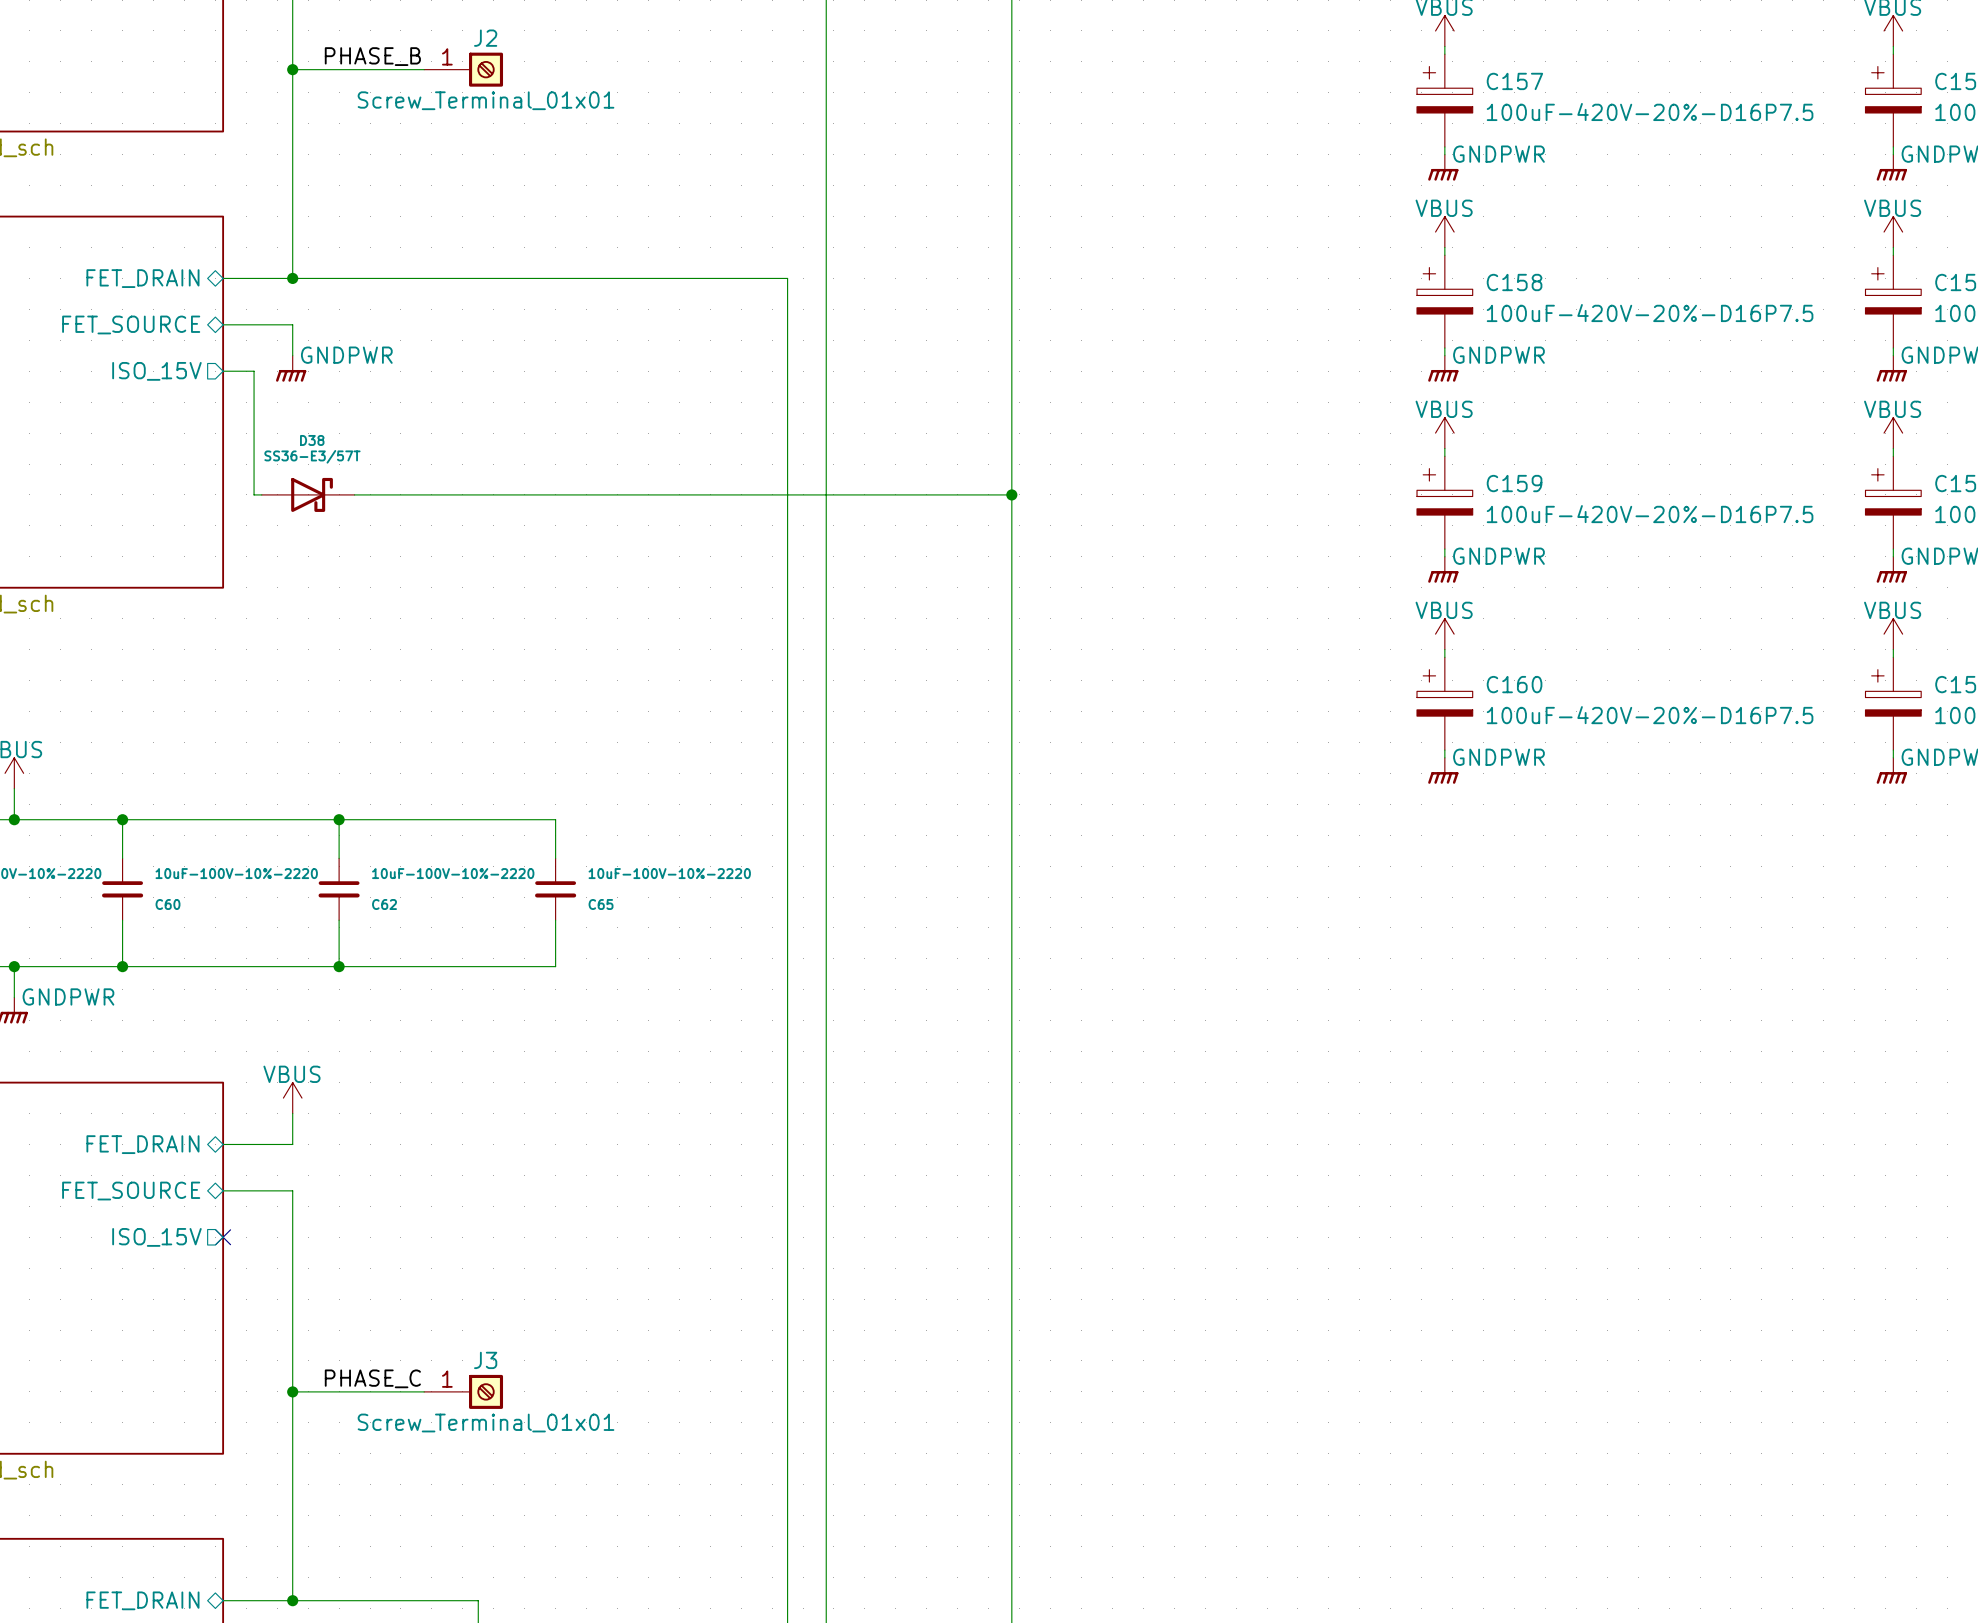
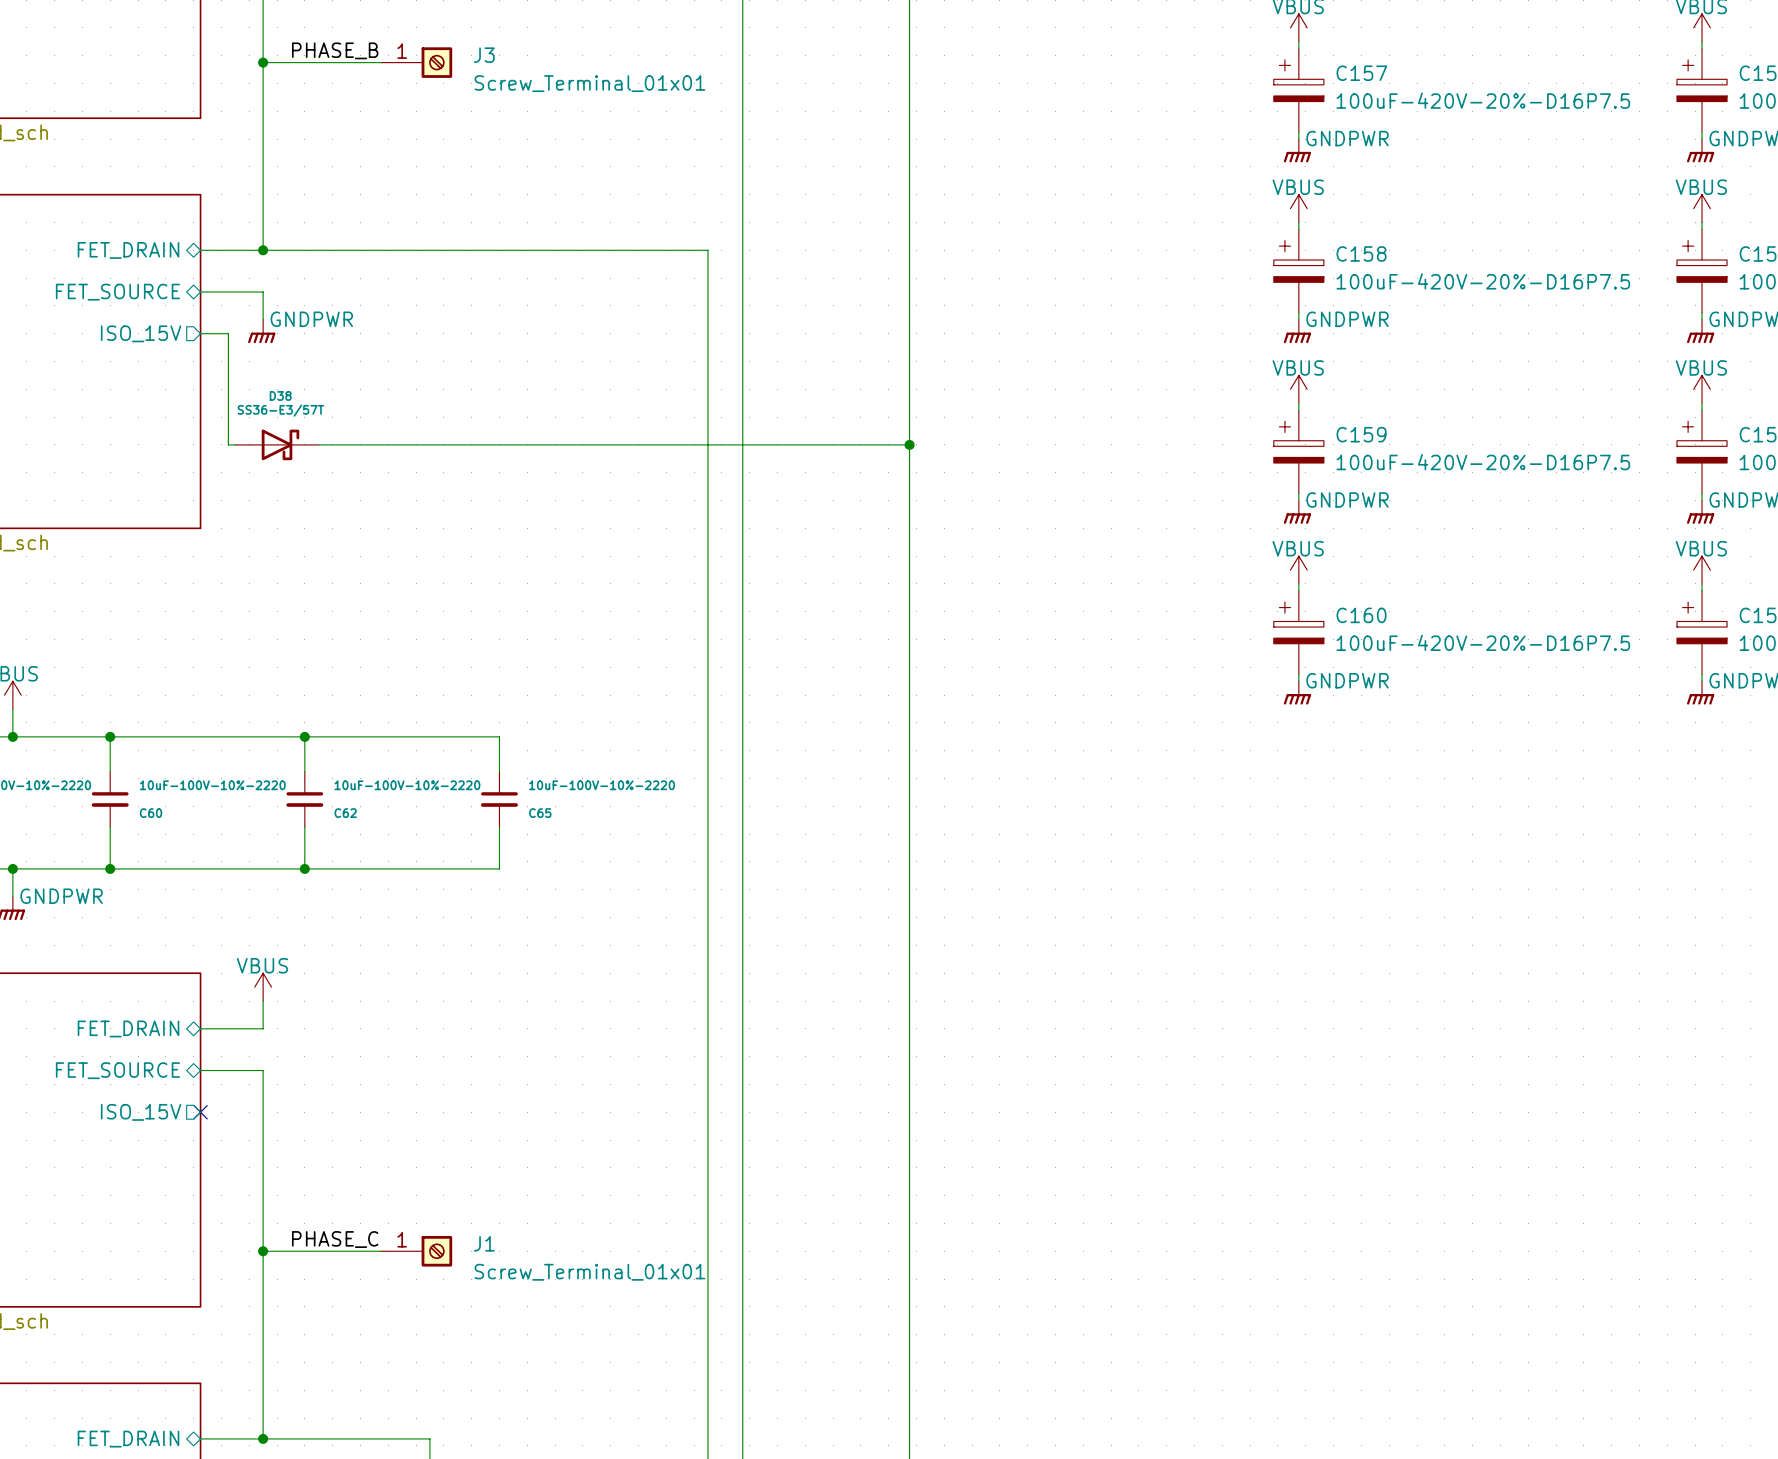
J2 name: J2 (485, 38) -> J3 (484, 55)
J2 value position: Screw_Terminal_01x01 (486, 100) -> Screw_Terminal_01x01 (589, 83)
J3 name: J3 (485, 1360) -> J1 (484, 1243)
J3 value position: Screw_Terminal_01x01 (486, 1423) -> Screw_Terminal_01x01 (589, 1272)

